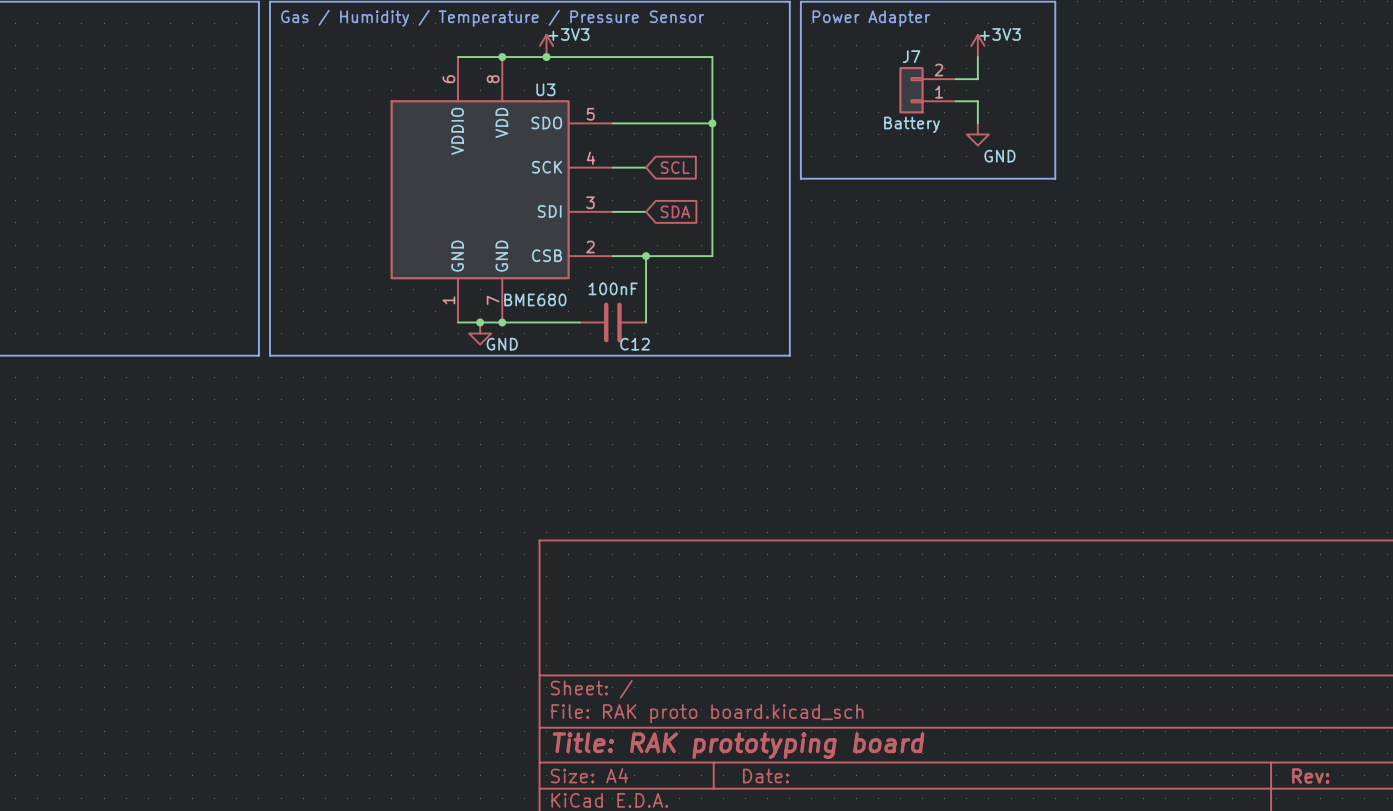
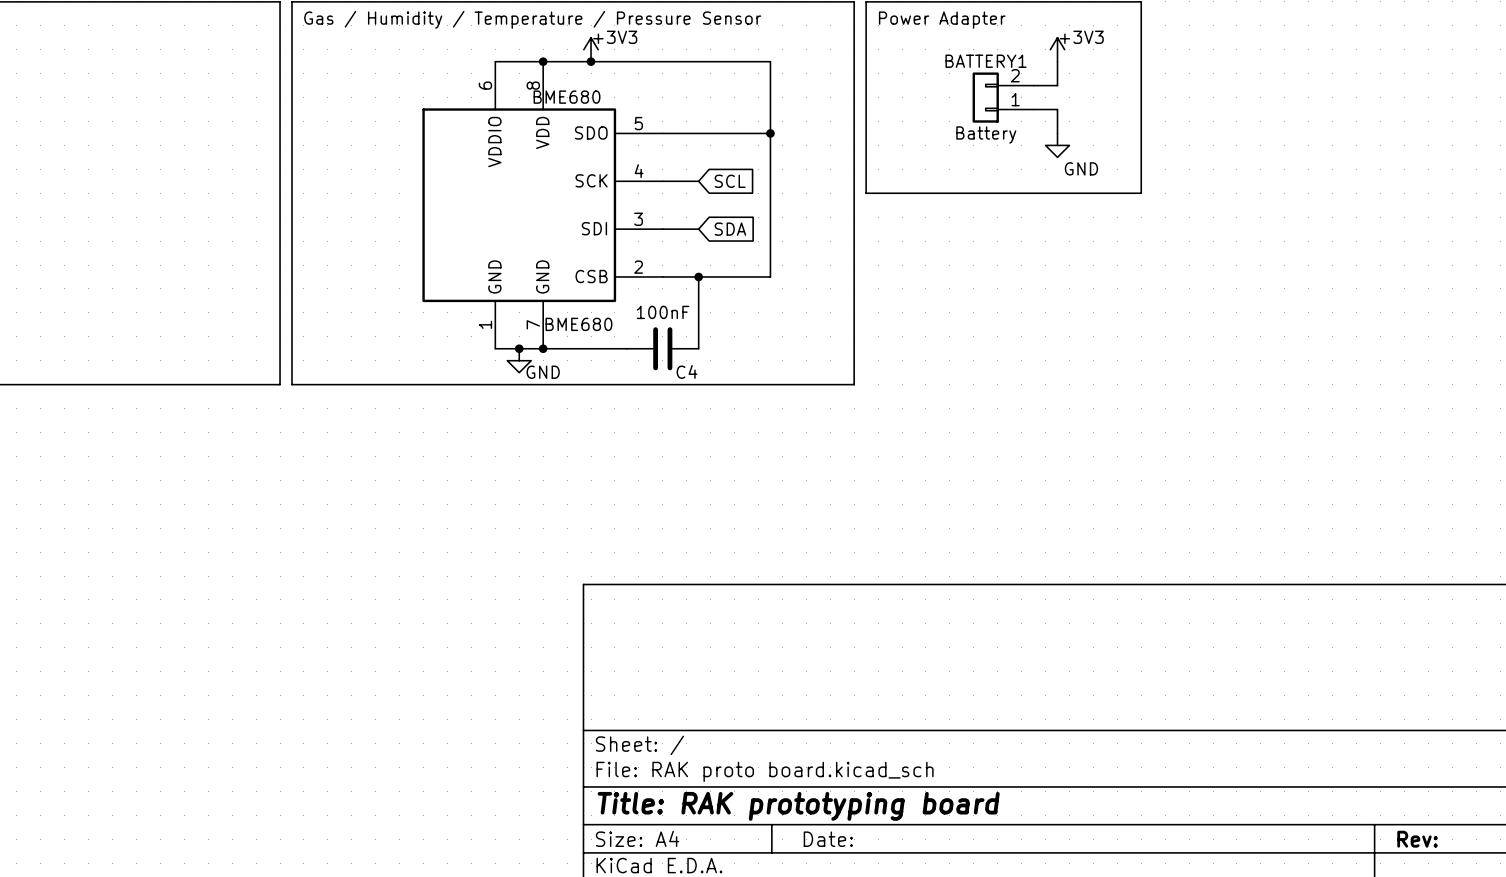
J7 name: J7 (911, 56) -> BATTERY1 (986, 61)
U3 name: U3 (545, 89) -> BME680 (567, 97)
C12 name: C12 (634, 344) -> C4 (686, 371)

